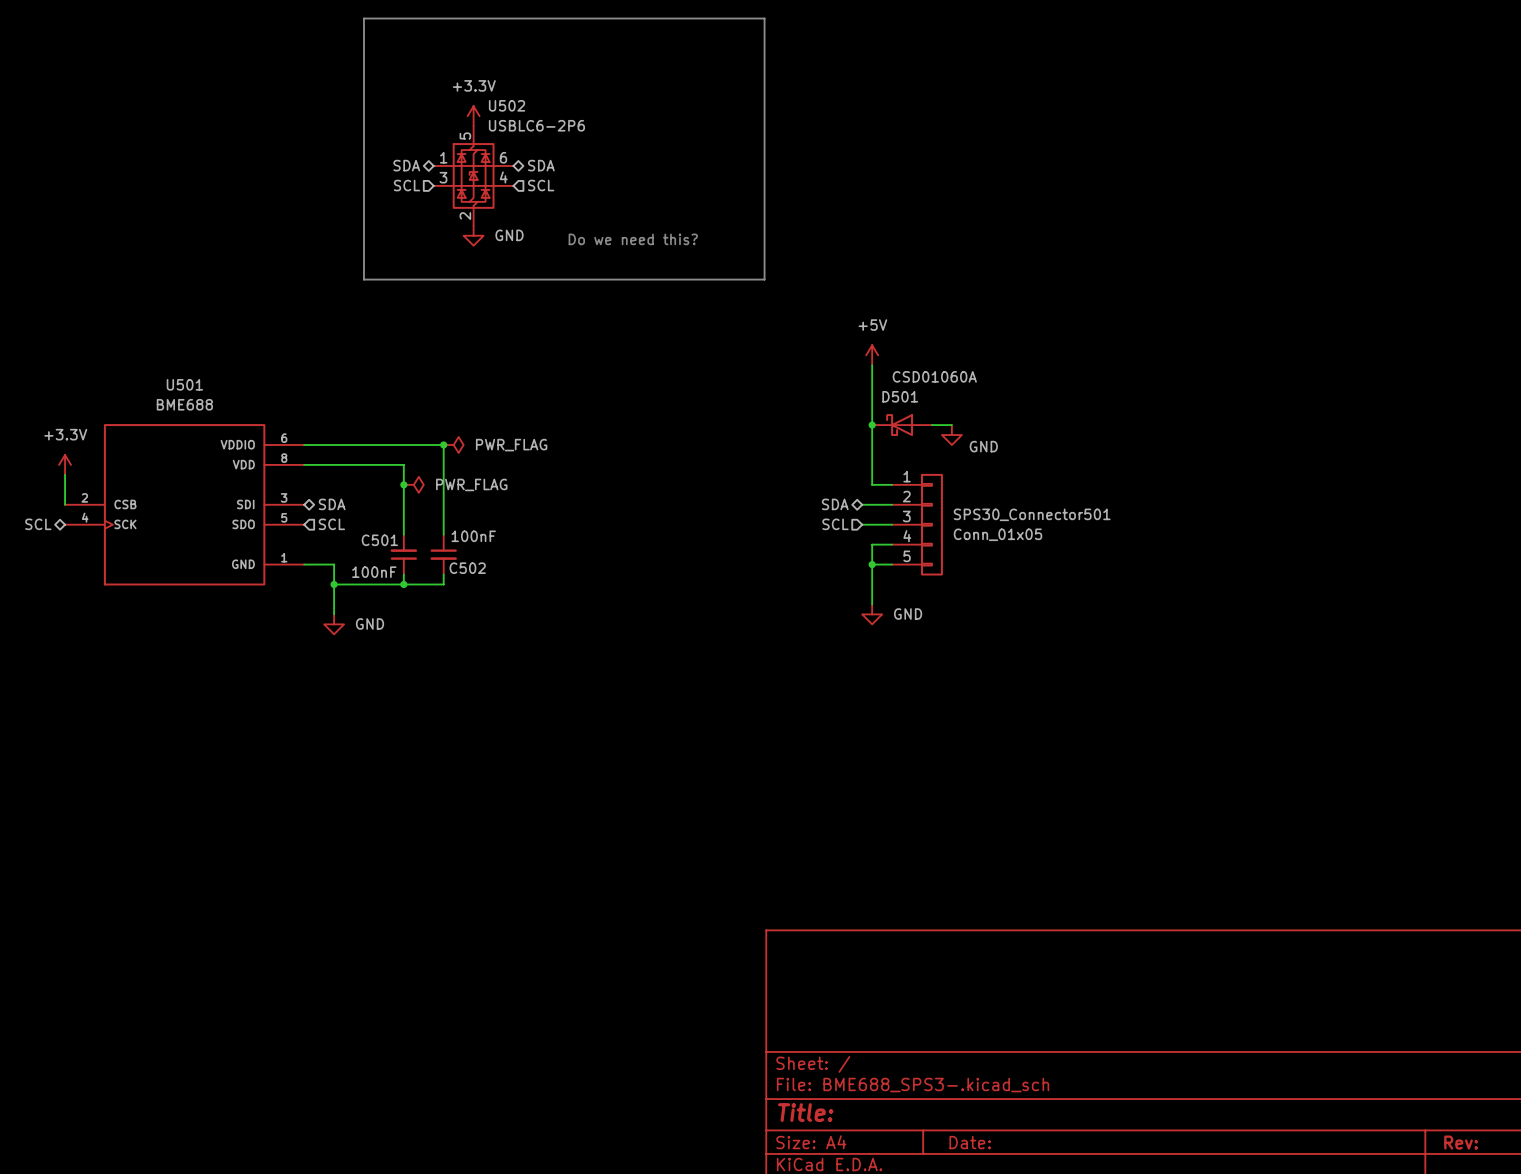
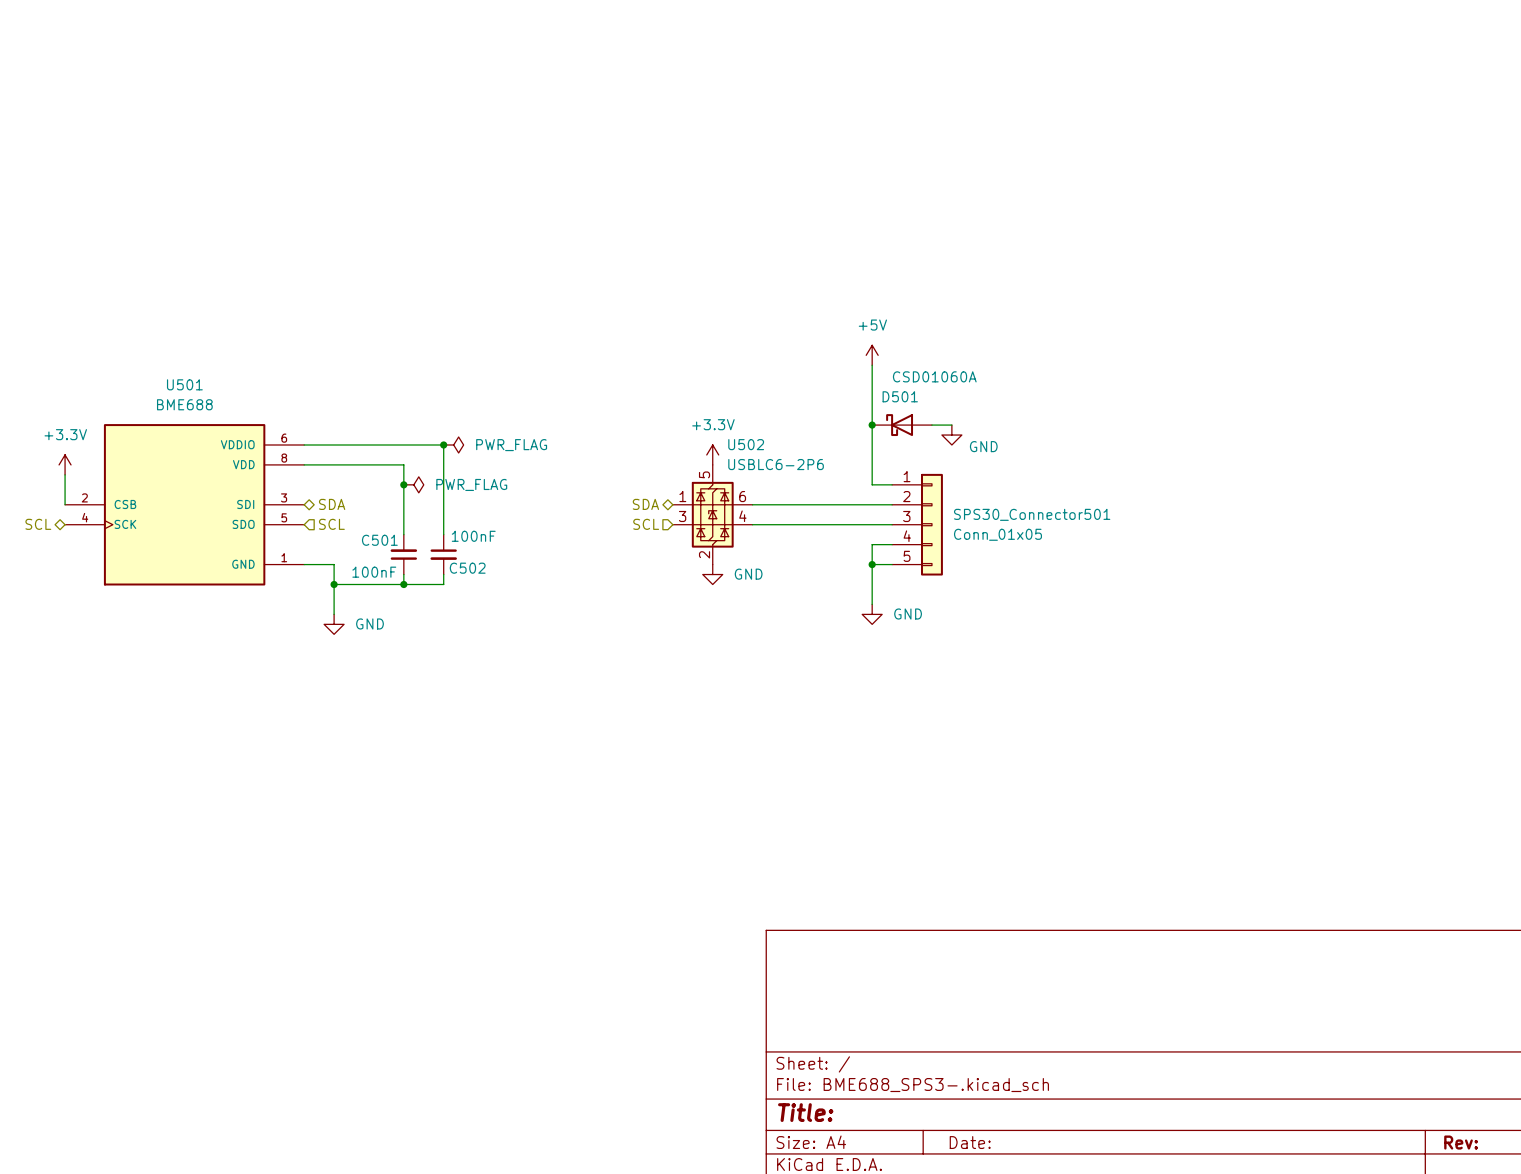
line: (363, 18) (764, 18) (764, 279) (363, 279) (363, 18) -> none
power symbol: +3.3V (473, 116) -> none
hierarchical label: SDA (406, 165) -> none
hierarchical label: SDA (541, 165) -> none
U502 position: (473, 175) -> (712, 514)
hierarchical label: SCL (407, 185) -> none
hierarchical label: SCL (541, 185) -> none
power symbol: GND (473, 235) -> none
text: Do we need this? (633, 239) -> none
power symbol: none -> +3.3V (712, 454)
hierarchical label: none -> SDA (645, 504)
wire: none -> (752, 504) (862, 504)
hierarchical label: SDA (835, 504) -> none
hierarchical label: none -> SCL (646, 524)
wire: none -> (752, 524) (862, 524)
hierarchical label: SCL (835, 524) -> none
power symbol: none -> GND (712, 574)

